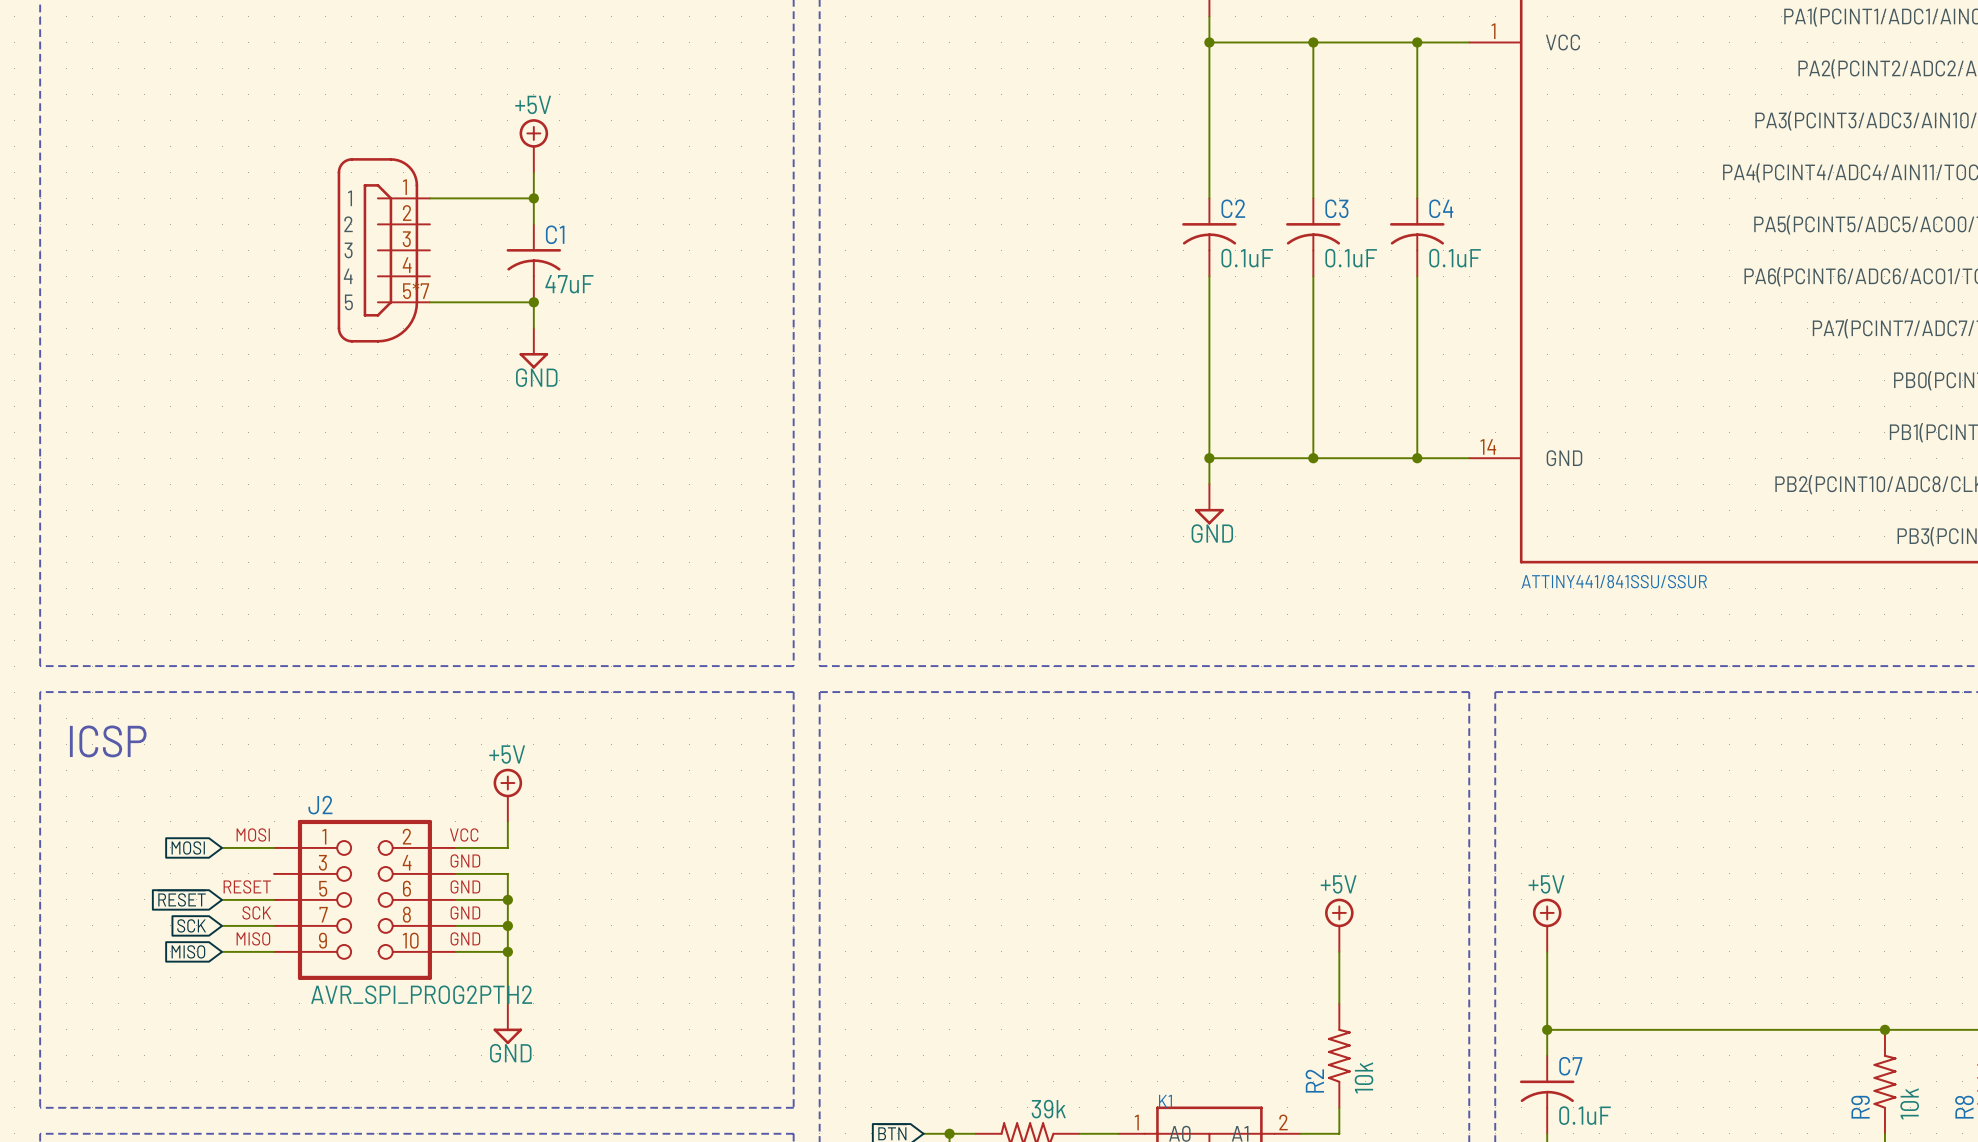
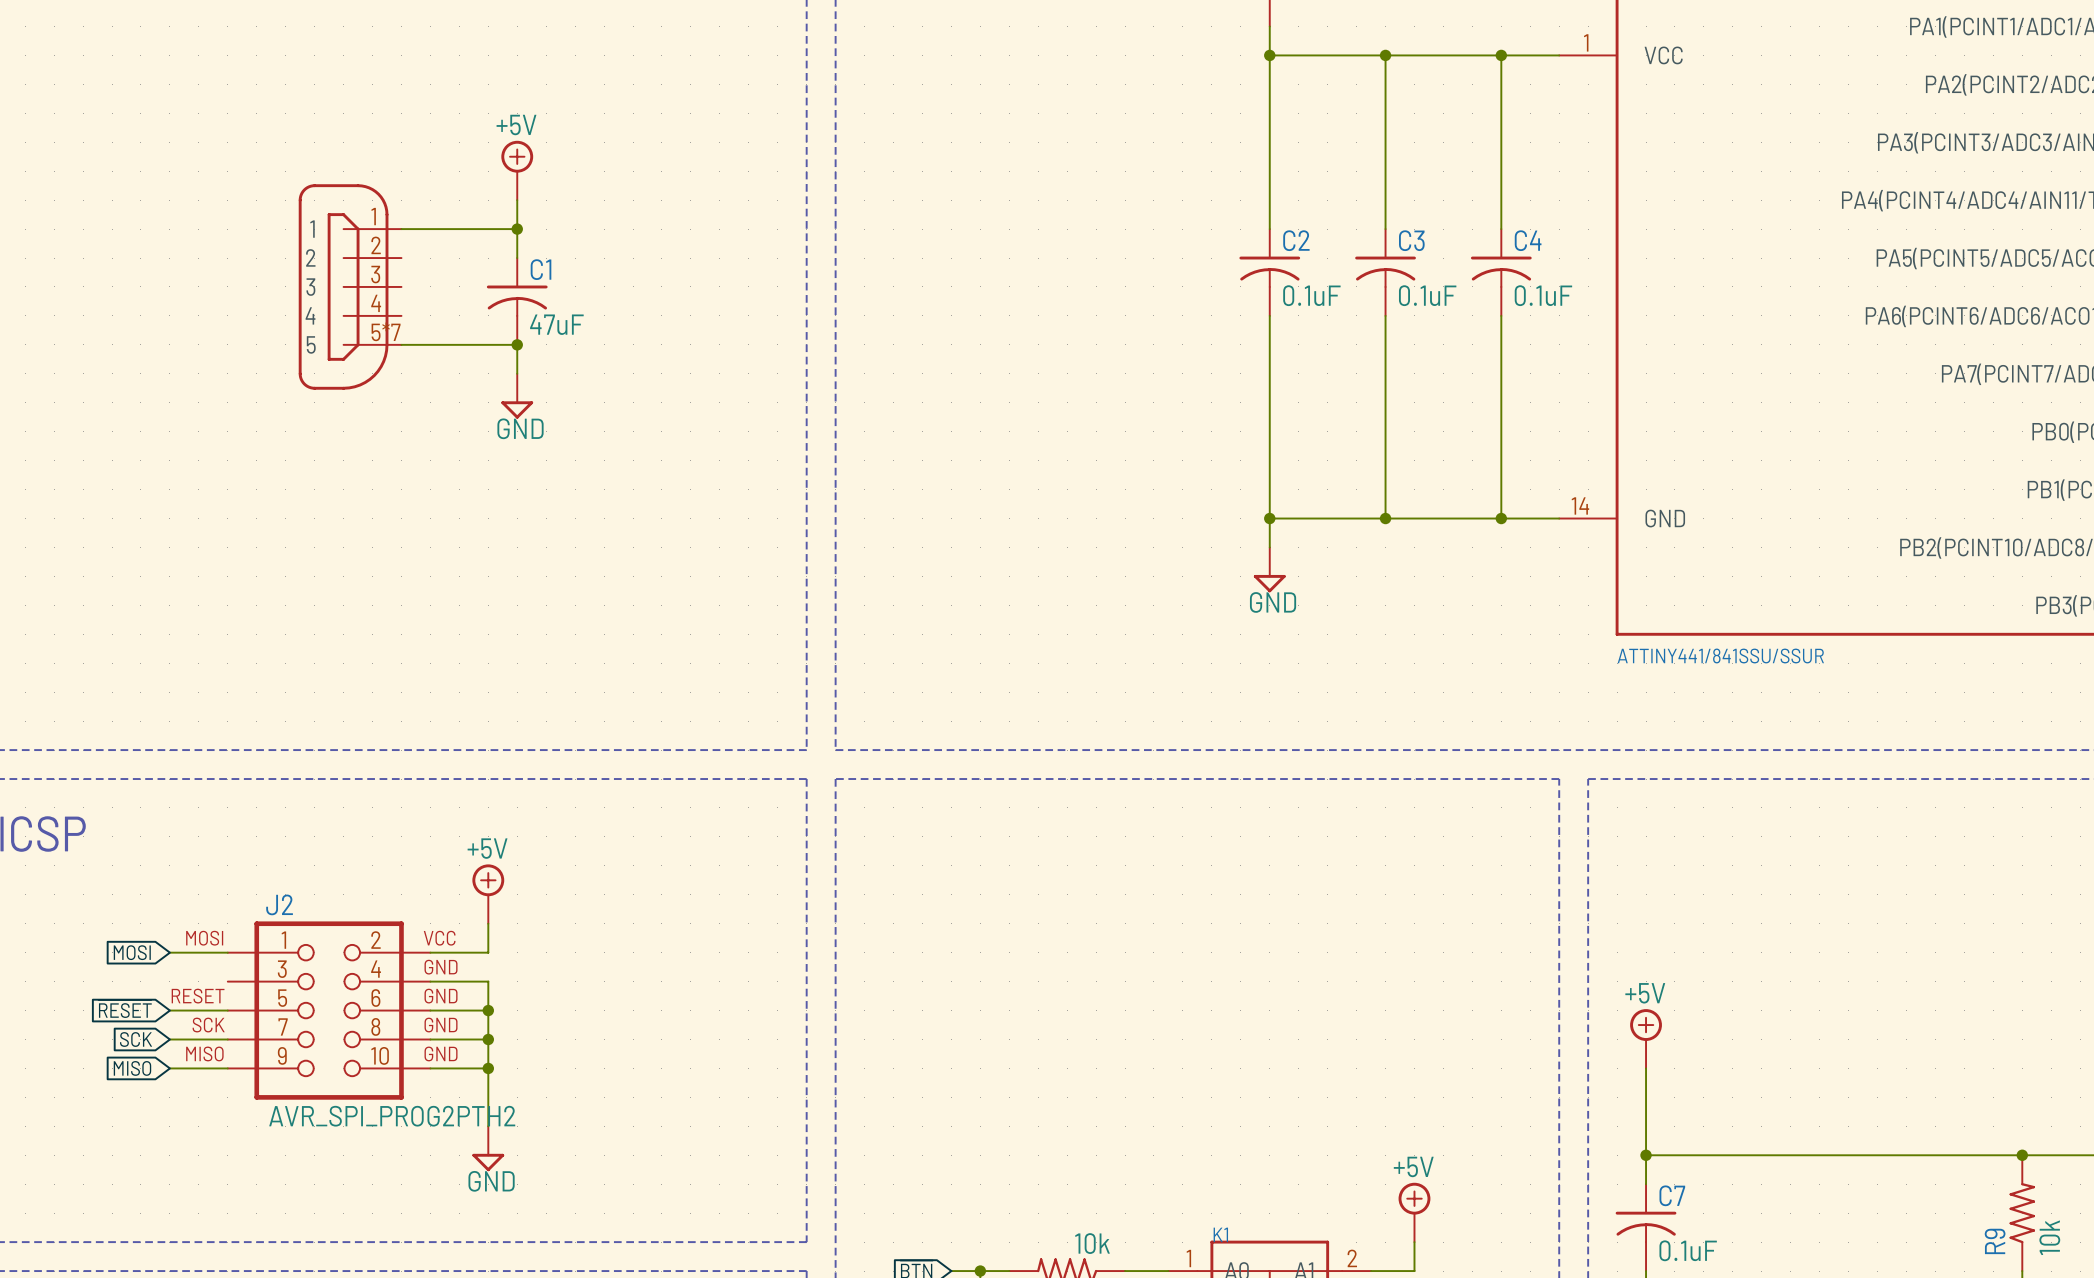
power symbol position: +5V (1339, 925) -> +5V (1414, 1212)
wire: (1339, 951) (1339, 1003) -> none
R2: 10k (1339, 1055) -> none
part value: 39k (1048, 1109) -> 10k (1092, 1243)

